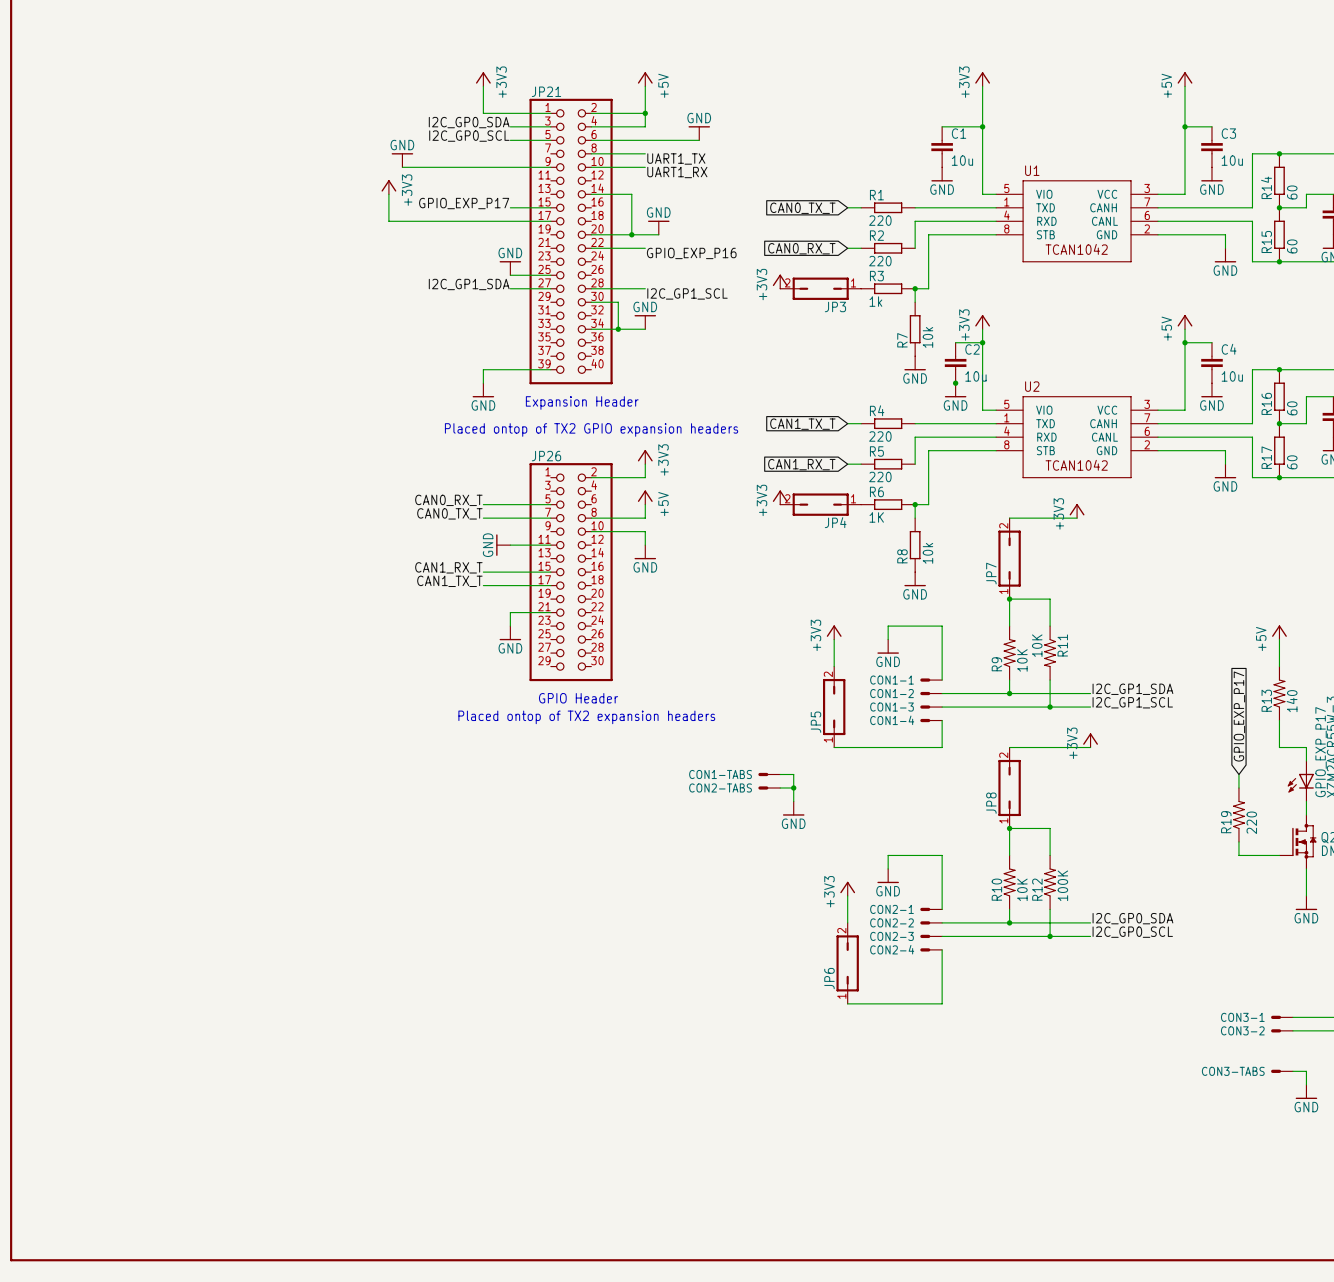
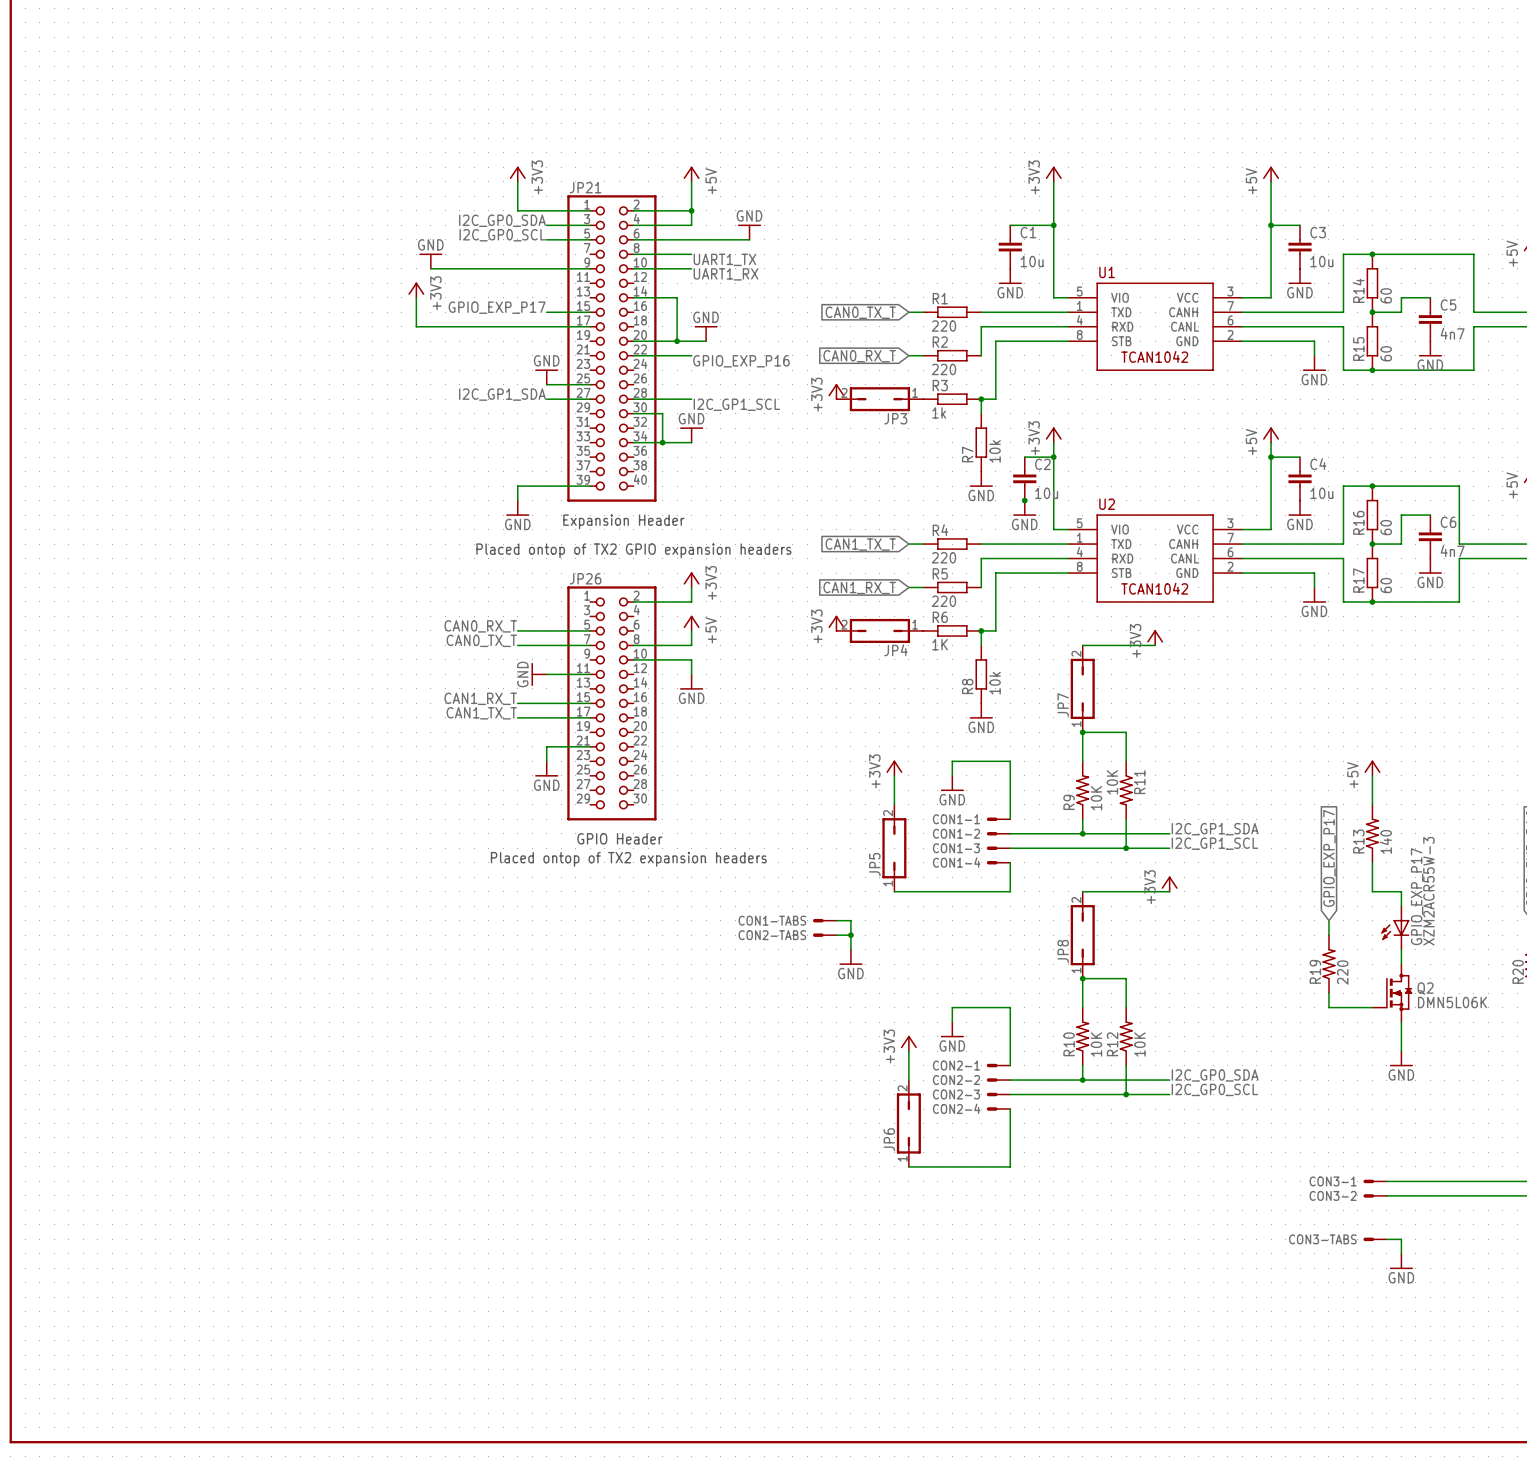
R12 value: 100K (1062, 885) -> 10K (1139, 1044)

